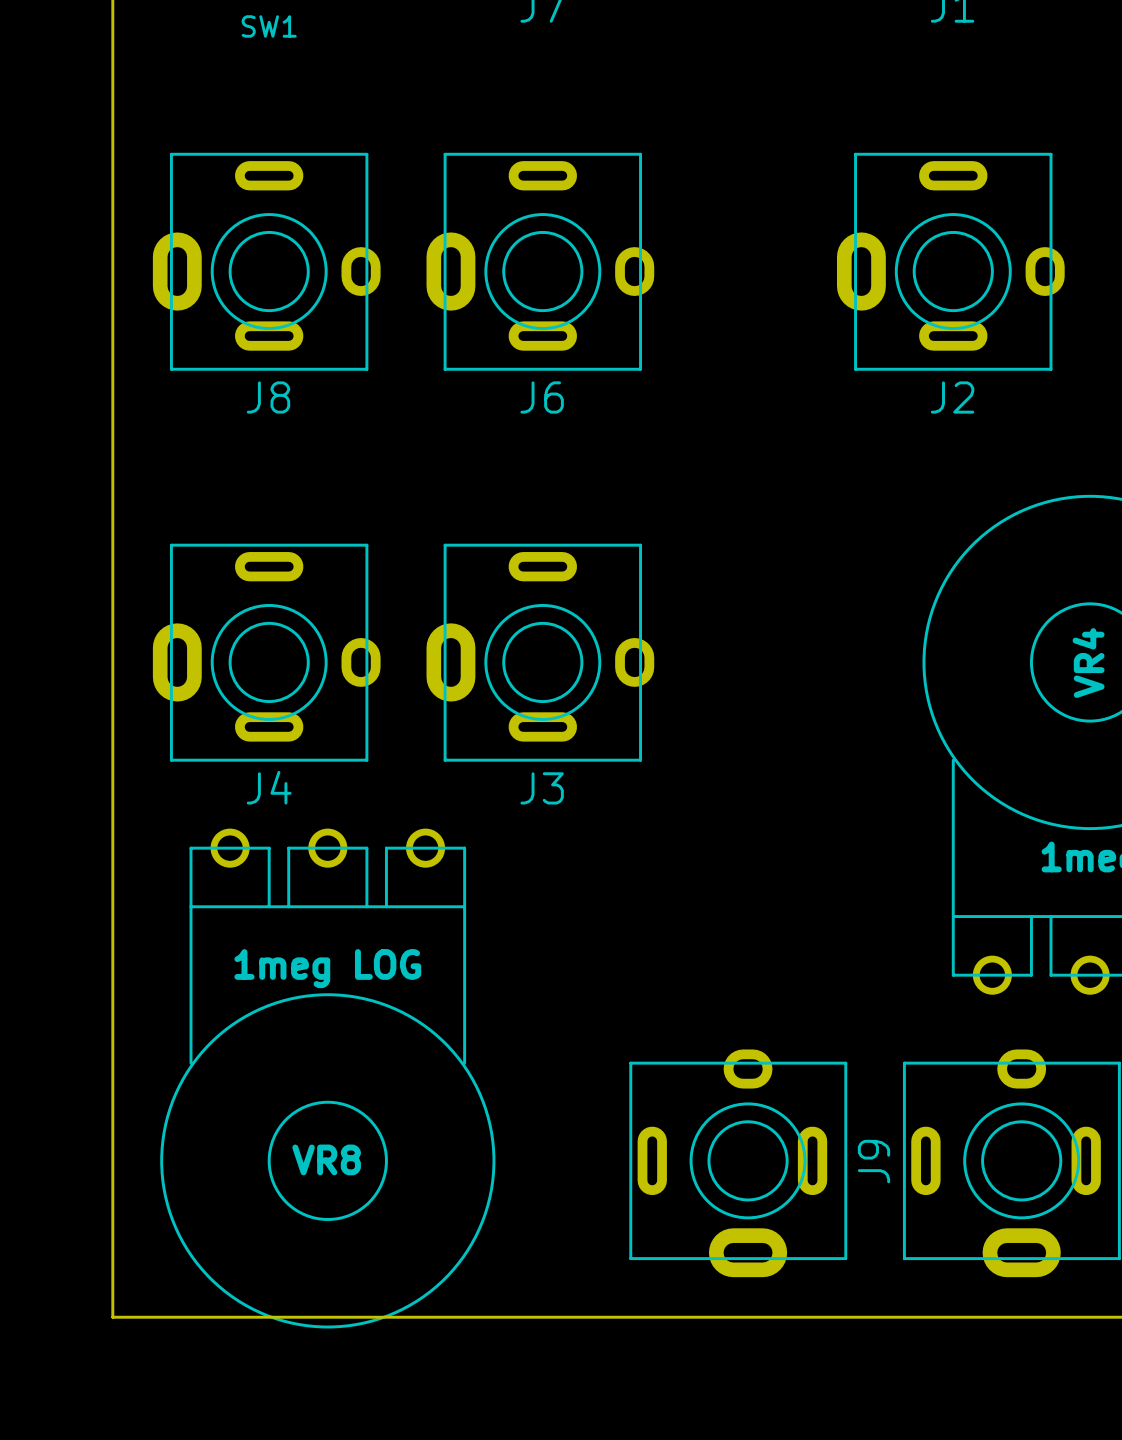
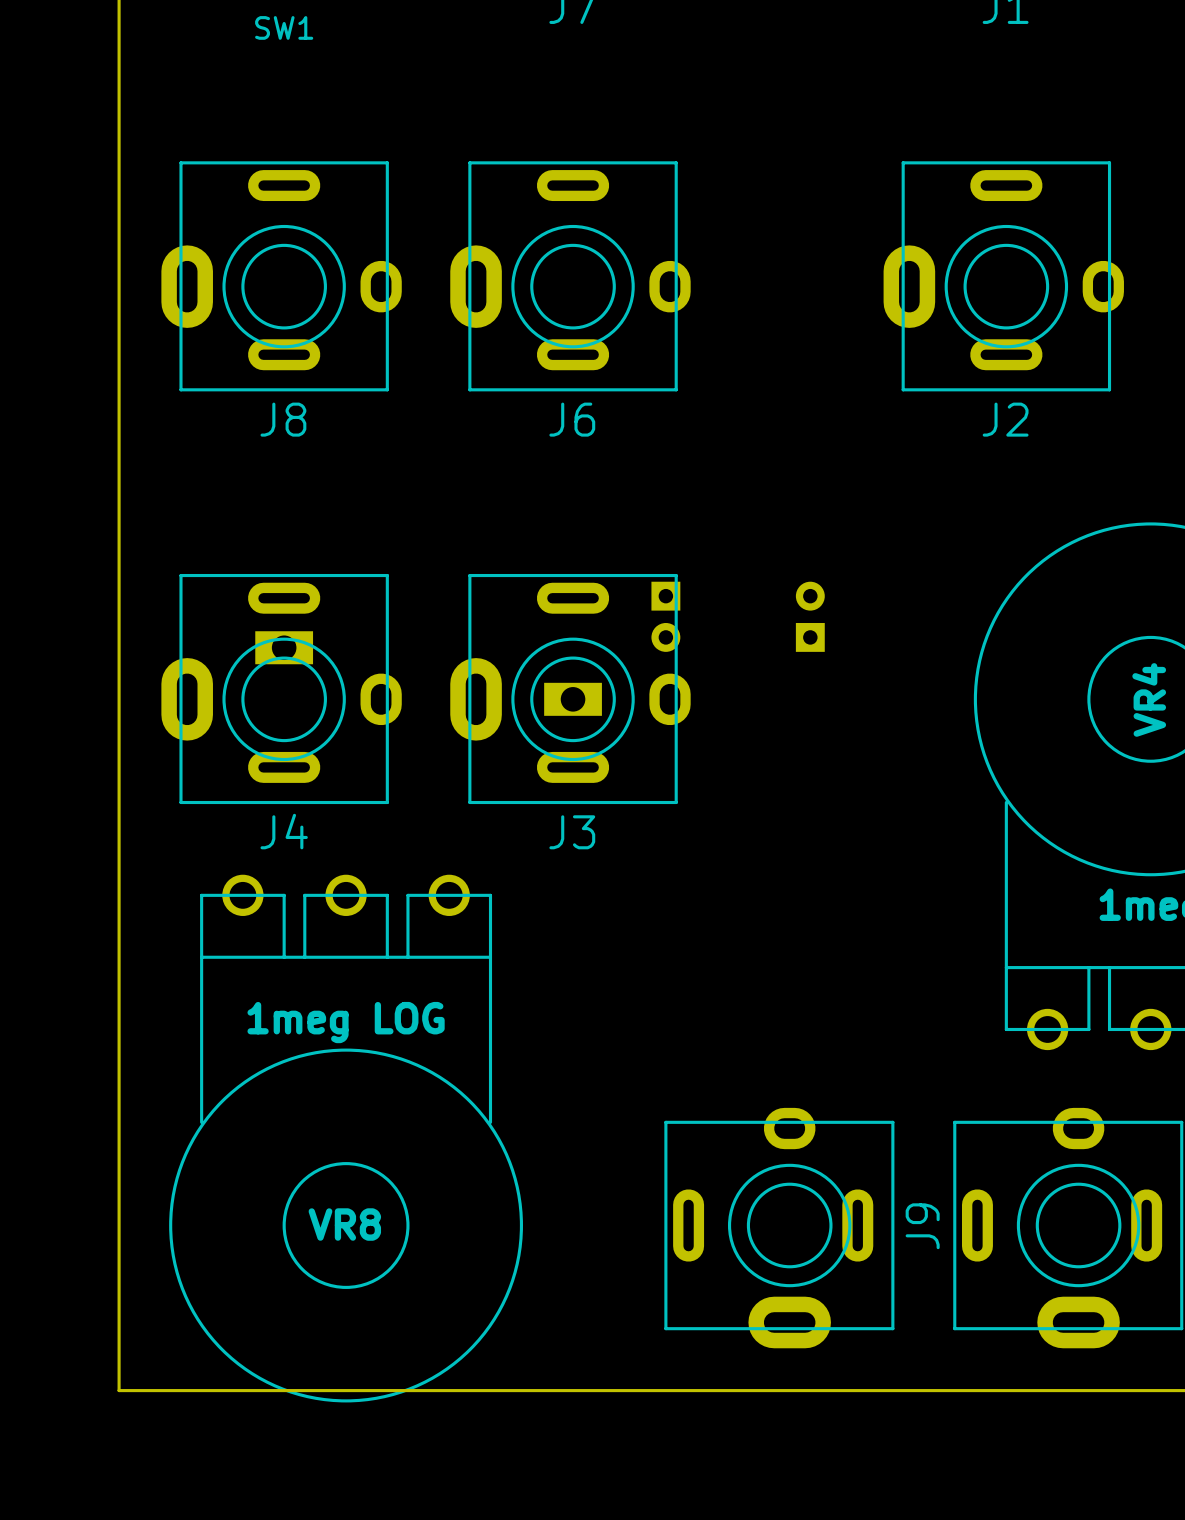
part: none -> (665, 616)
part: none -> (810, 616)
part: none -> (284, 647)
part: none -> (573, 699)

